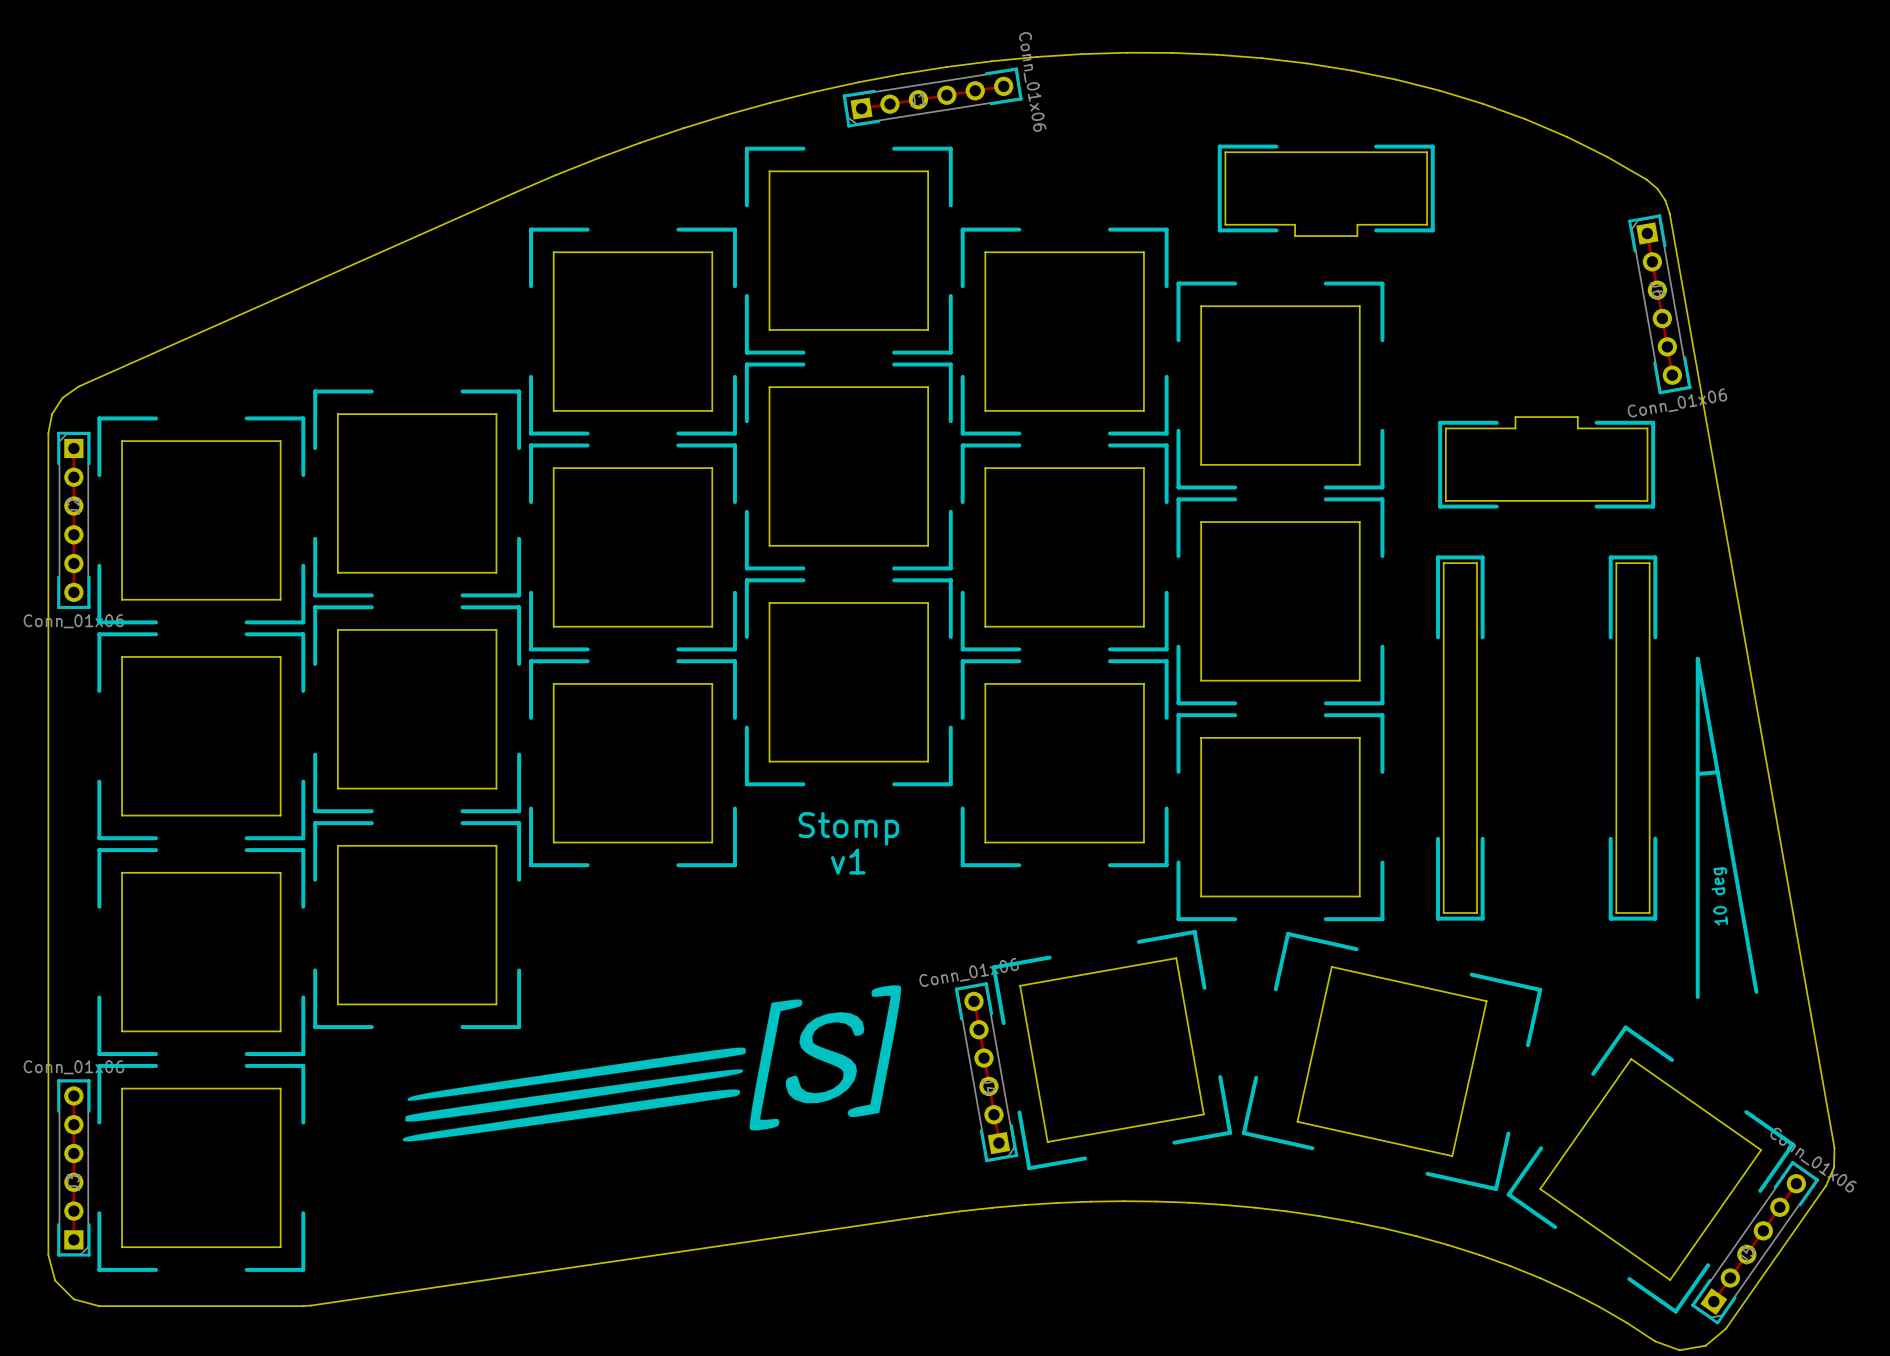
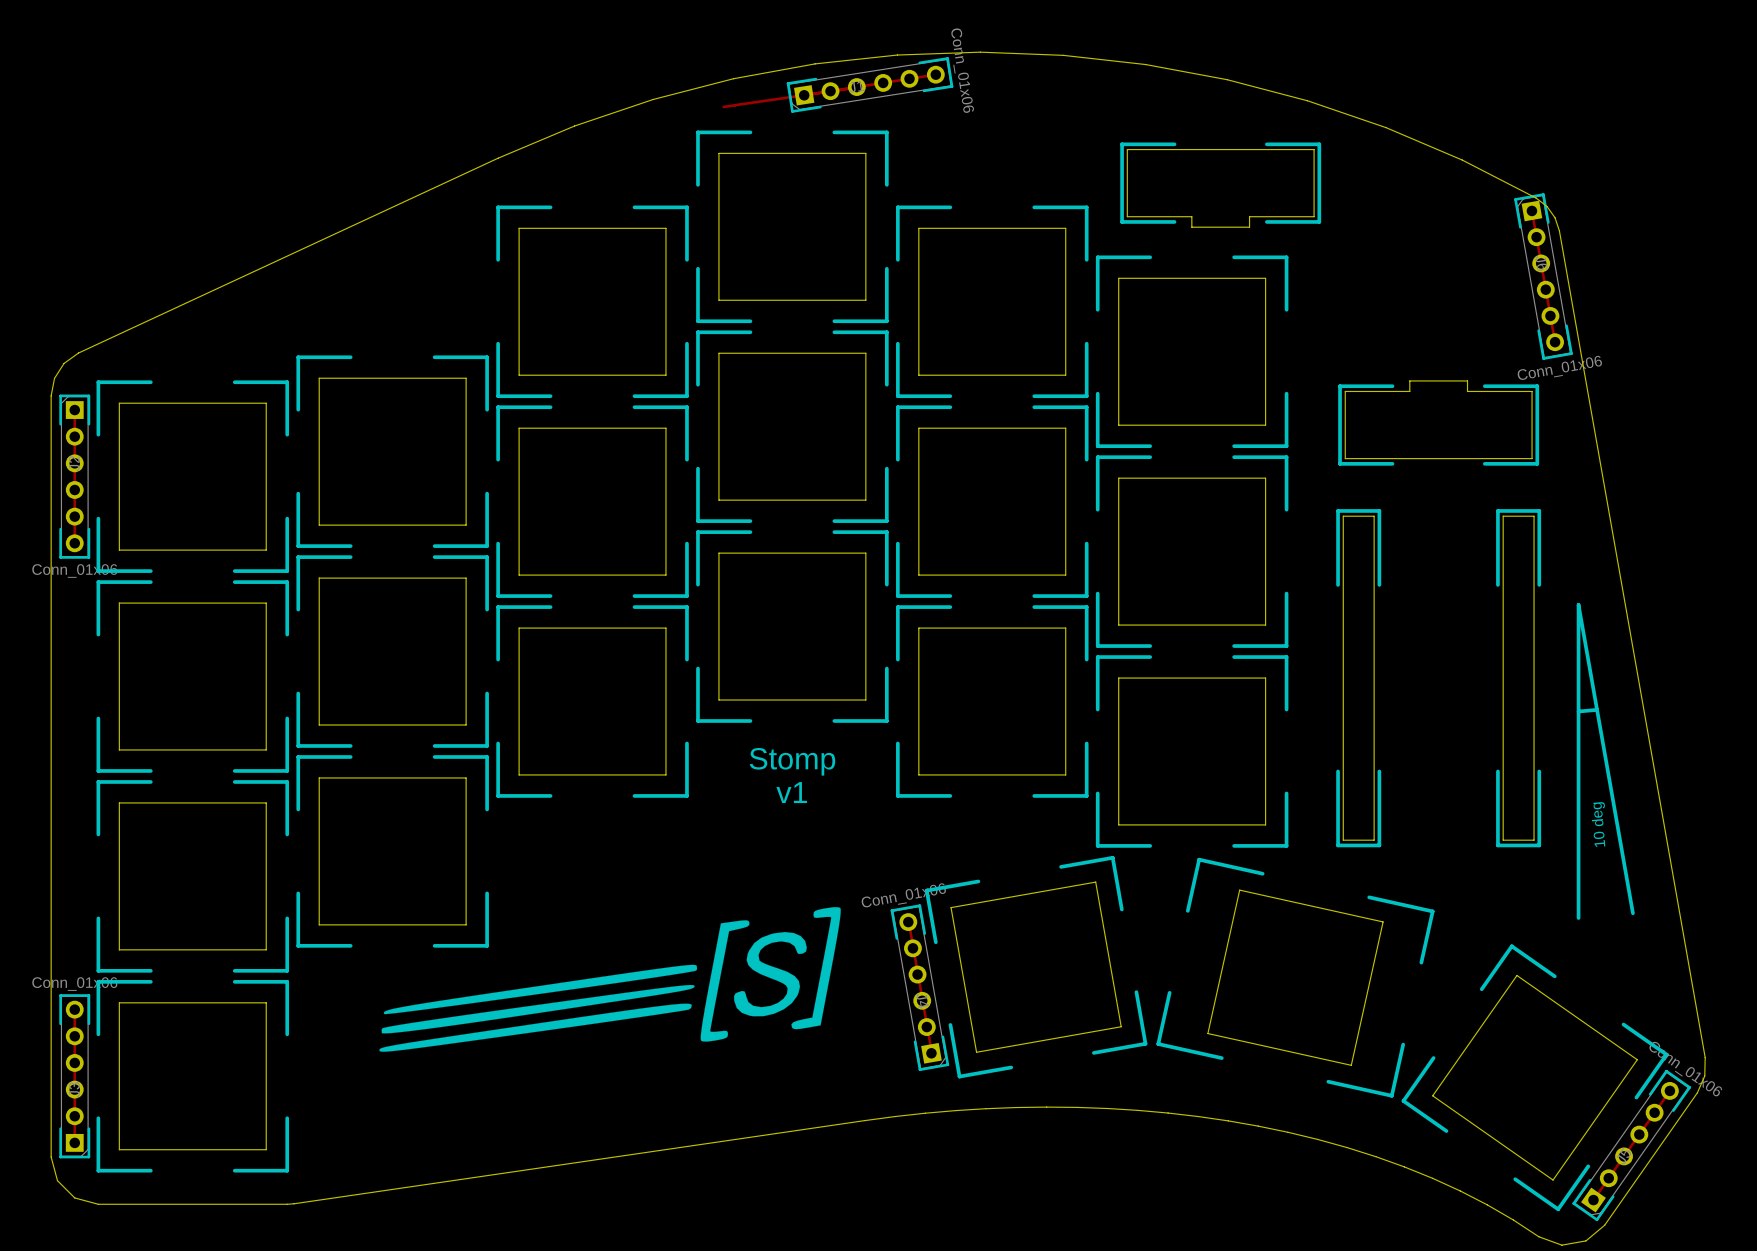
top track: none -> (855, 87) (735, 105)
top track: none -> (735, 105) (723, 106)
line: (1276, 146) (1219, 146) (1219, 230) (1276, 230) -> (1174, 144) (1122, 144) (1122, 221) (1174, 221)
line: (1376, 146) (1432, 146) (1432, 230) (1376, 230) -> (1266, 144) (1319, 144) (1319, 221) (1266, 221)
board edge: (1225, 152) (1225, 224) (1295, 224) (1295, 236) (1357, 236) (1357, 224) (1427, 224) (1427, 152) (1225, 152) -> (1127, 149) (1127, 216) (1191, 216) (1191, 227) (1249, 227) (1249, 216) (1314, 216) (1314, 149) (1127, 149)
board edge: (1677, 255) (1665, 200) (1657, 188) (1646, 179) (1566, 136) (1525, 119) (1439, 90) (1351, 70) (1307, 63) (1217, 54) (1126, 52) (991, 61) (902, 74) (813, 92) (726, 115) (598, 158) (514, 192) (78, 386) (62, 397) (52, 414) (48, 433) -> (1559, 230) (1555, 217) (1547, 206) (1536, 198) (1462, 160) (1385, 127) (1307, 100) (1227, 79) (1145, 64) (1063, 55) (980, 52) (897, 55) (815, 63) (733, 78) (653, 99) (574, 126) (498, 158) (78, 353) (64, 363) (54, 378) (51, 395)

